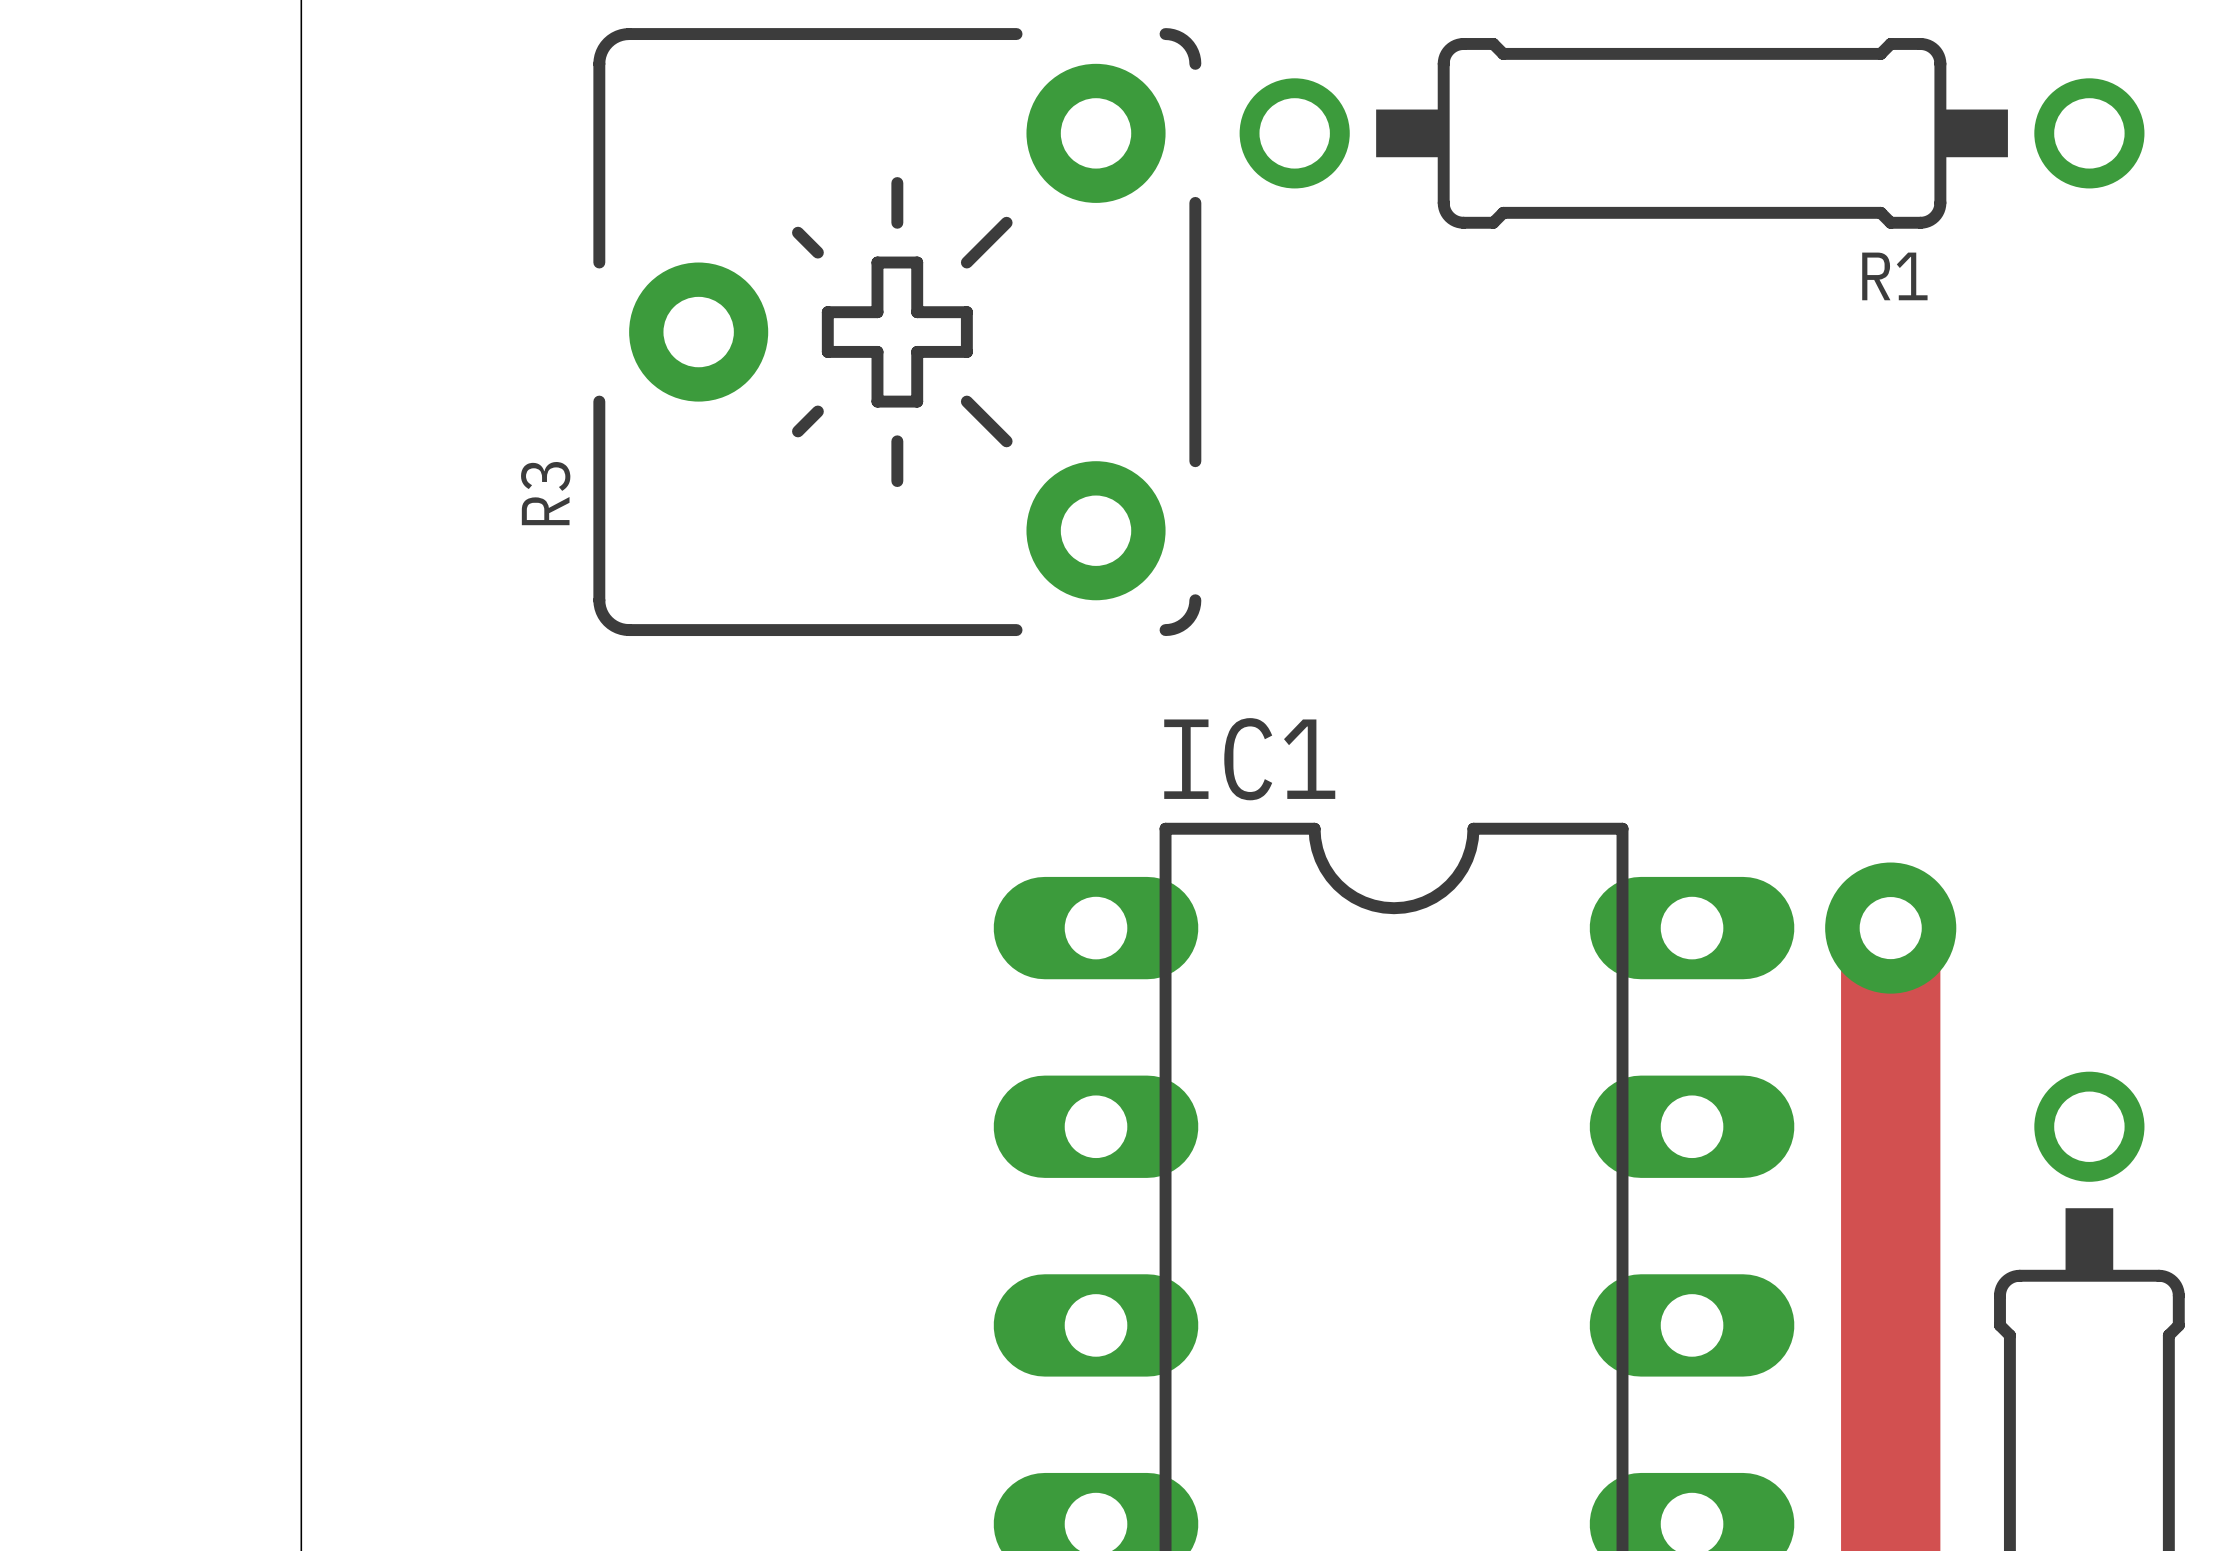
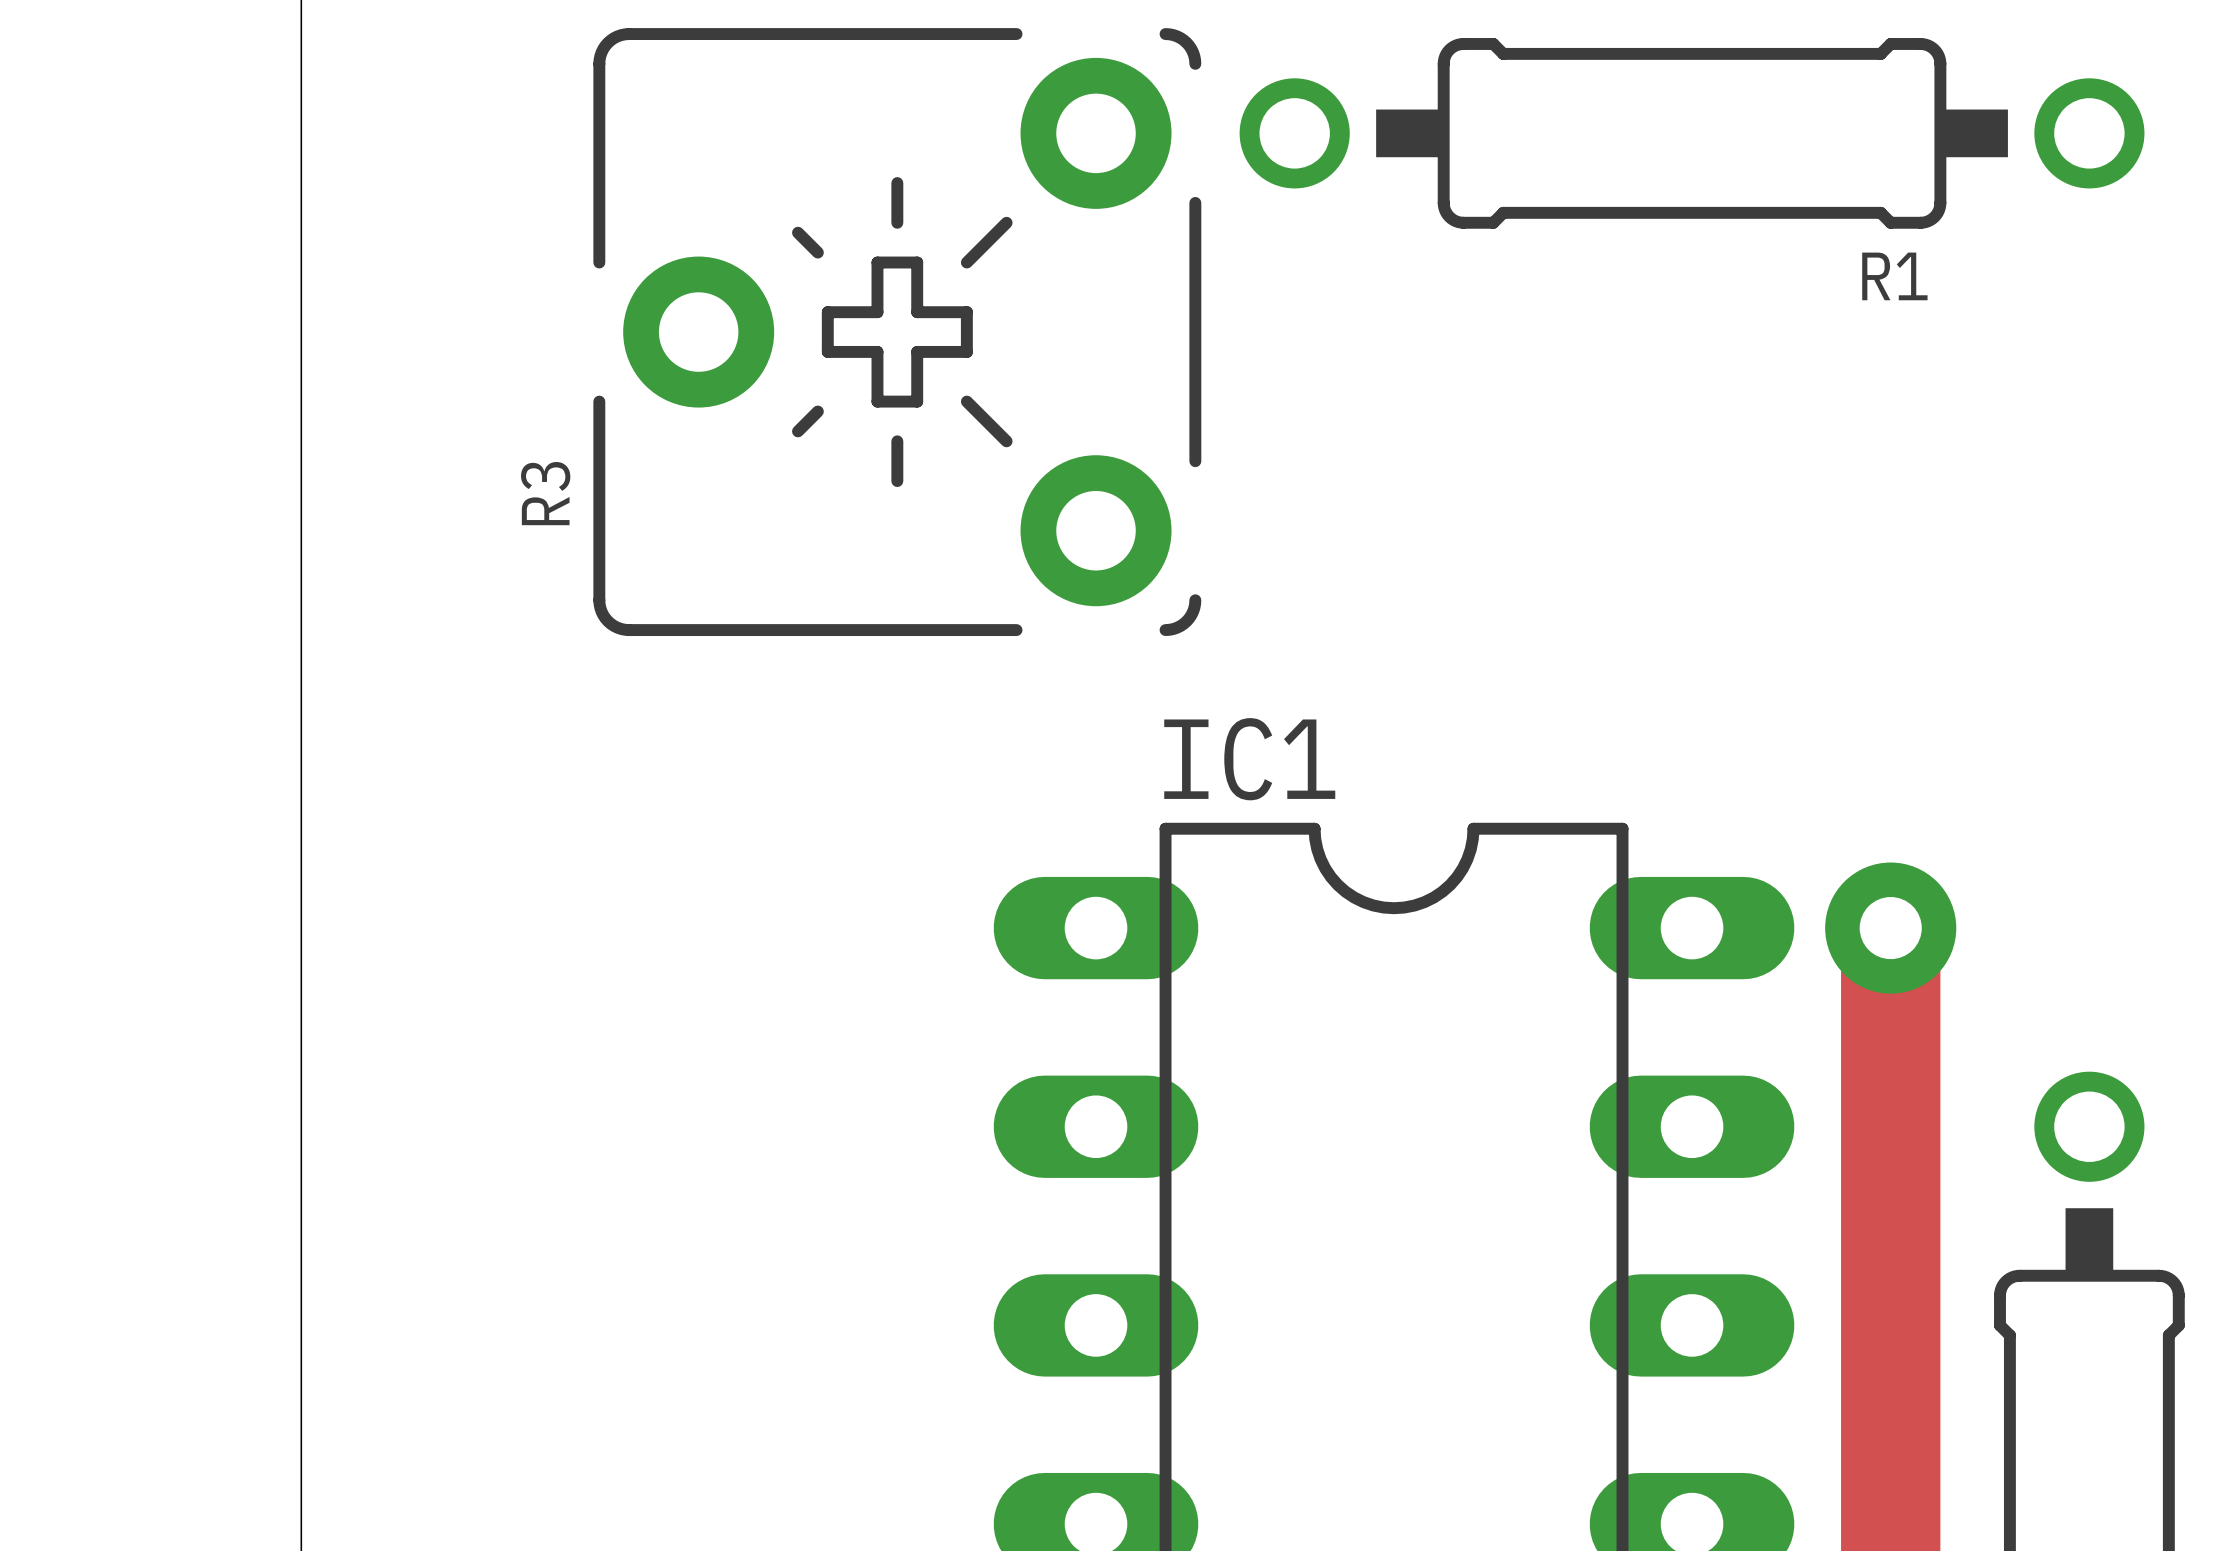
R3 footprint: [593, 28, 1202, 637] -> [593, 28, 1202, 637]

